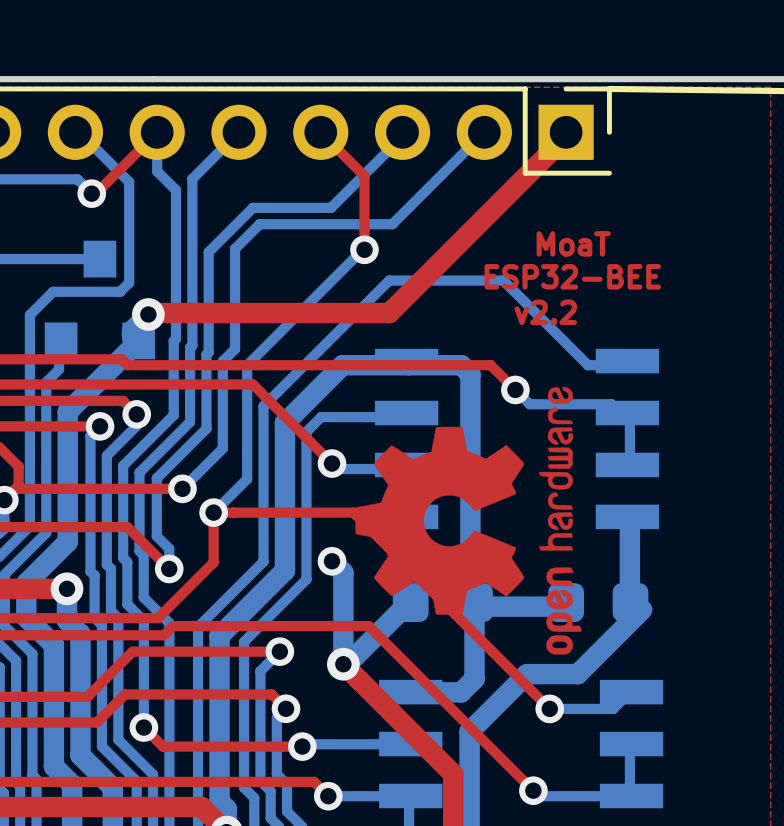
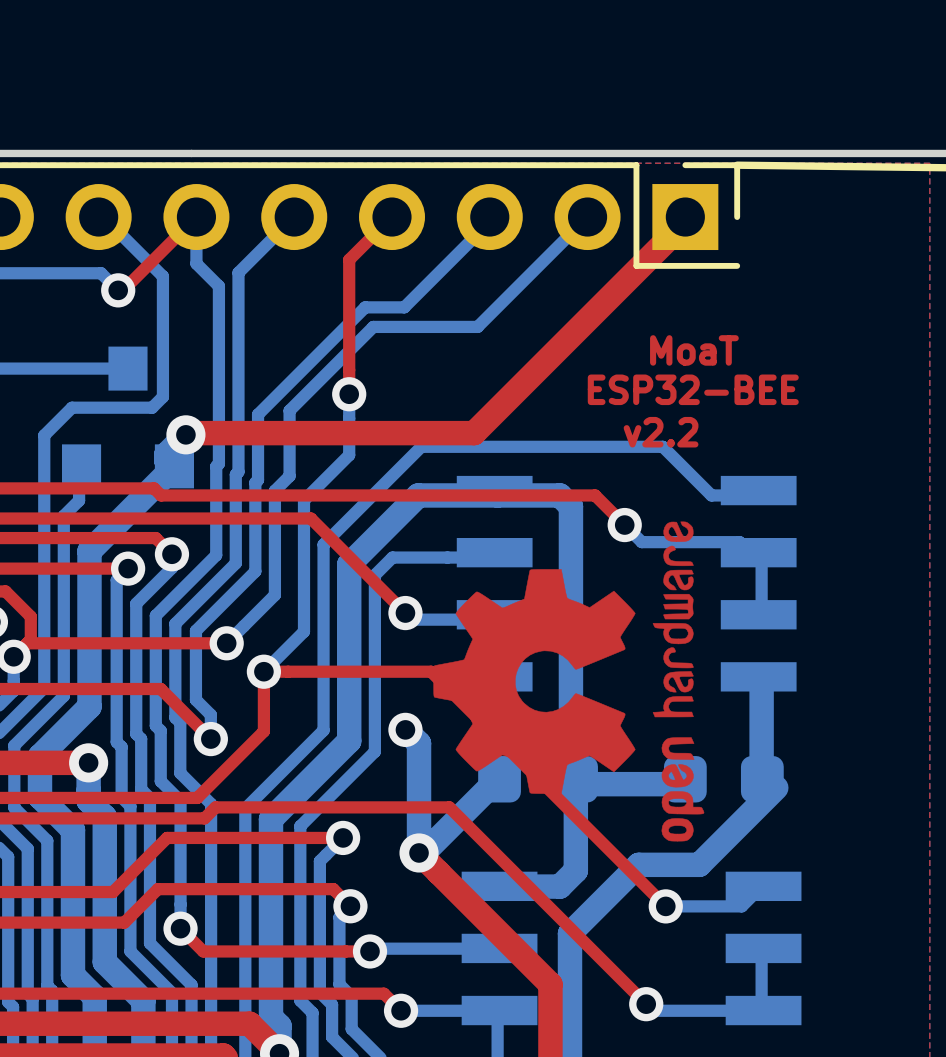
top track: (320, 132) (364, 176) (364, 249) -> (392, 217) (349, 259) (349, 394)
bottom track: (298, 207) (252, 207) (208, 252) (208, 297) -> (365, 307) (258, 414)
bottom track: (305, 224) (259, 224) (235, 248) (235, 294) -> (373, 326) (289, 410)
bottom track: (364, 249) (247, 365) (247, 369) -> (349, 394) (349, 455) (303, 500)
via position: (364, 249) -> (349, 394)
bottom track: (345, 324) (389, 280) (503, 280) (547, 324) -> (421, 446) (662, 446)

